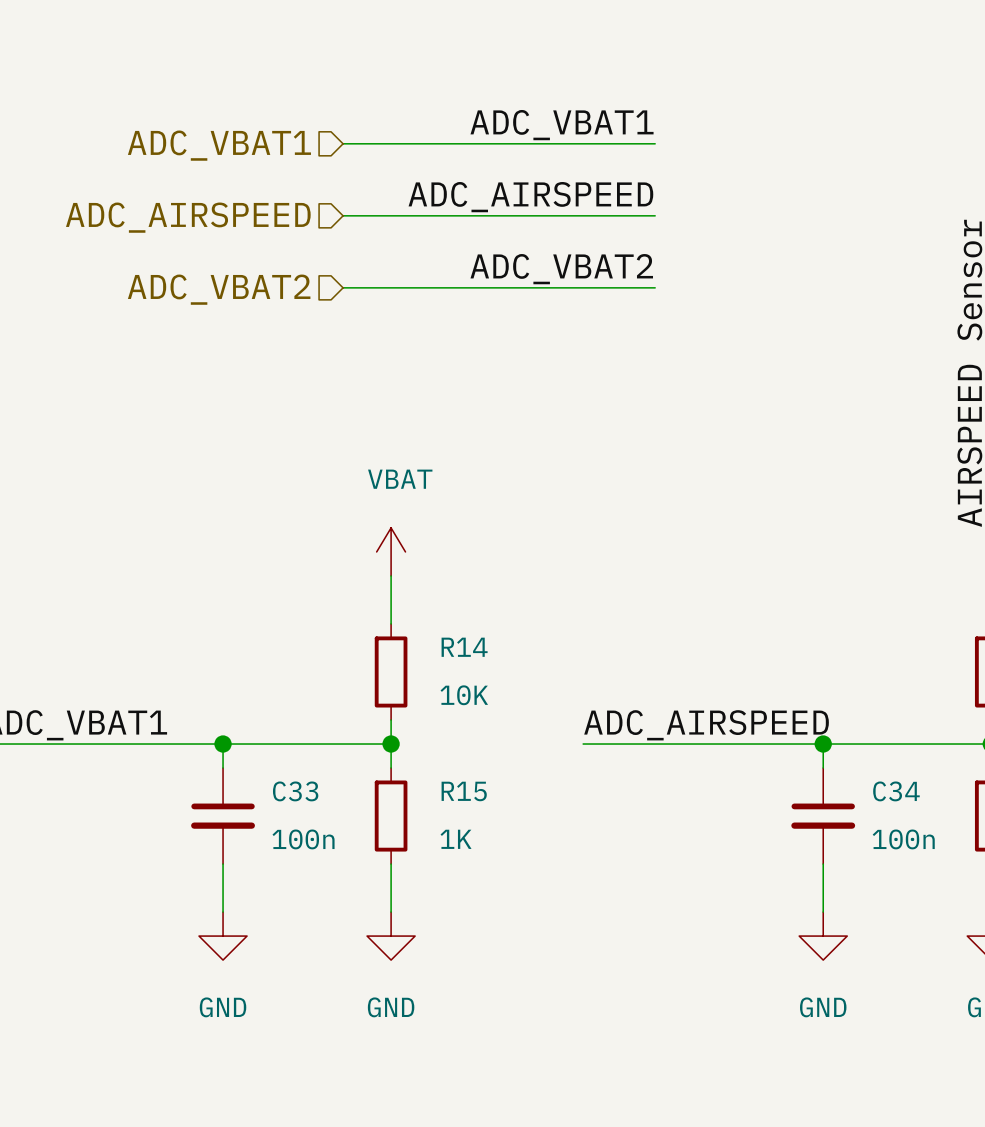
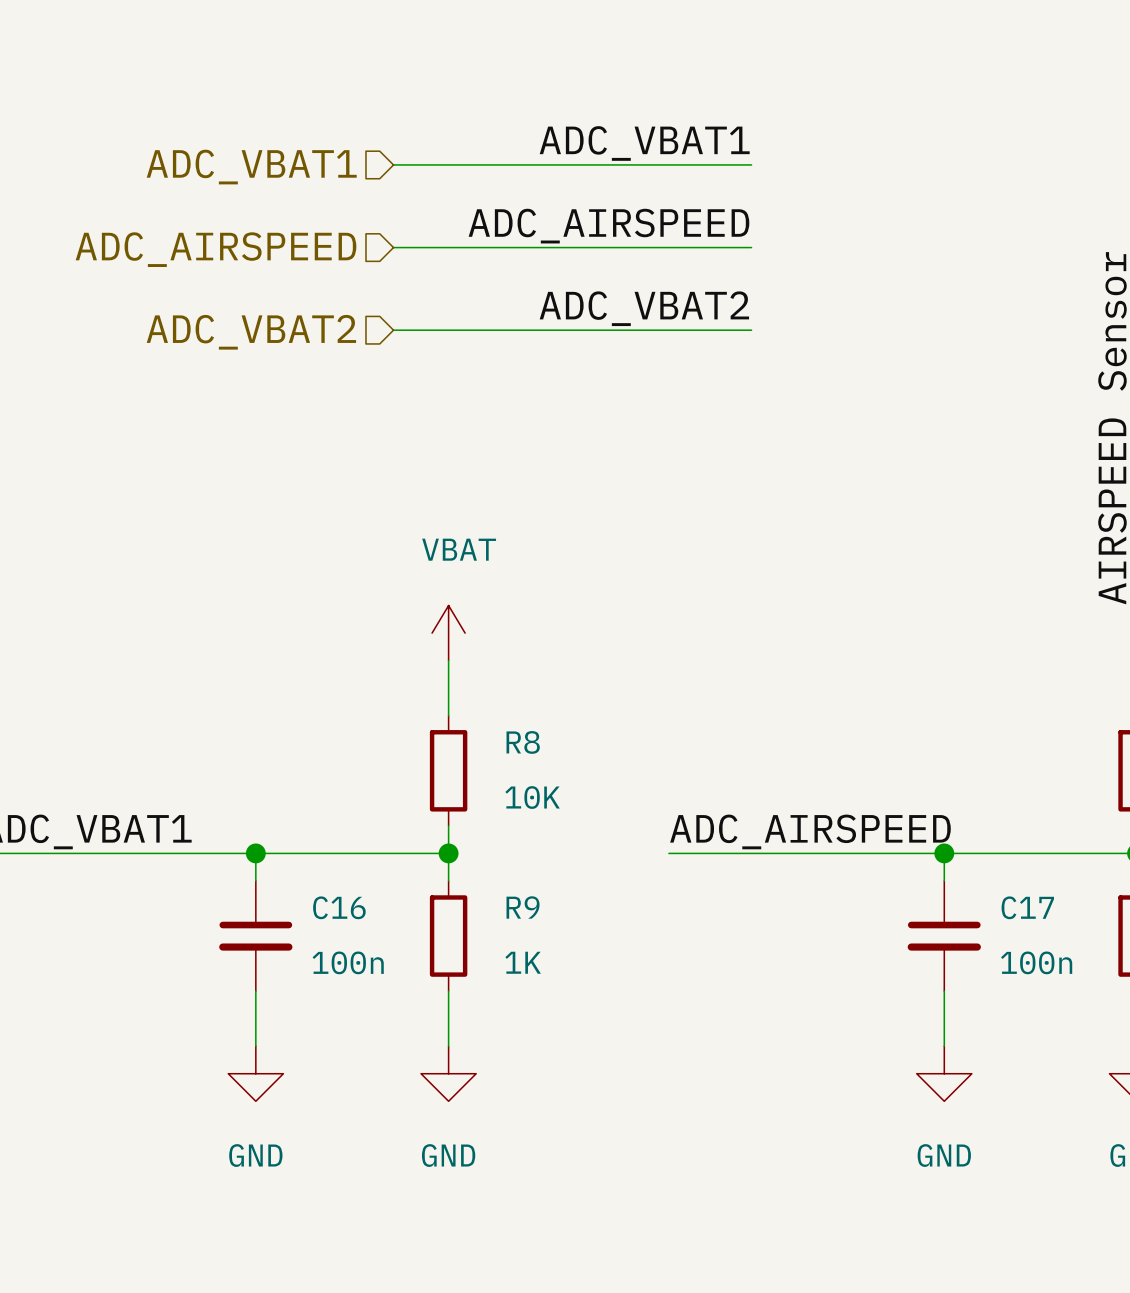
R14 name: R14 (464, 647) -> R8 (523, 742)
C33 name: C33 (295, 791) -> C16 (339, 907)
R15 name: R15 (464, 791) -> R9 (523, 907)
C34 name: C34 (896, 791) -> C17 (1027, 907)

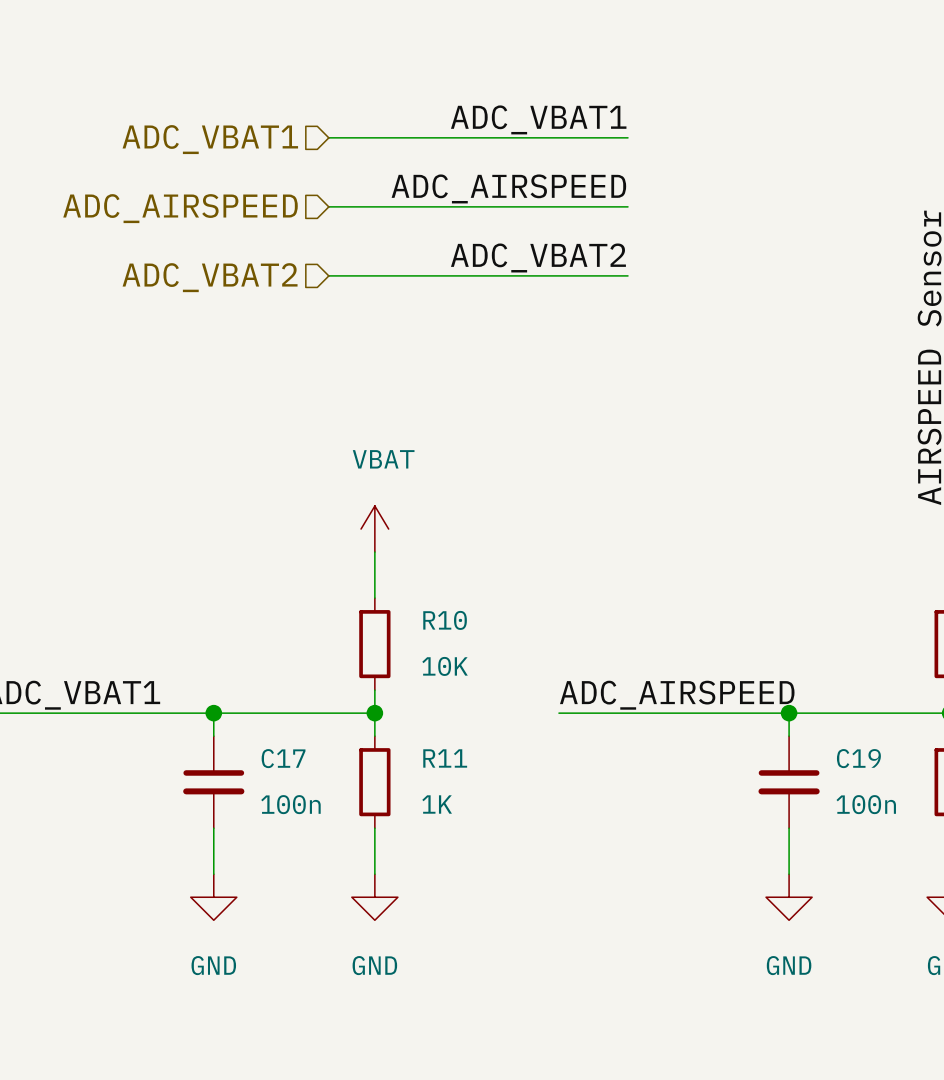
R8 name: R8 (523, 742) -> R10 (445, 620)
C16 name: C16 (339, 907) -> C17 (283, 758)
R9 name: R9 (523, 907) -> R11 (445, 758)
C17 name: C17 (1027, 907) -> C19 (858, 758)

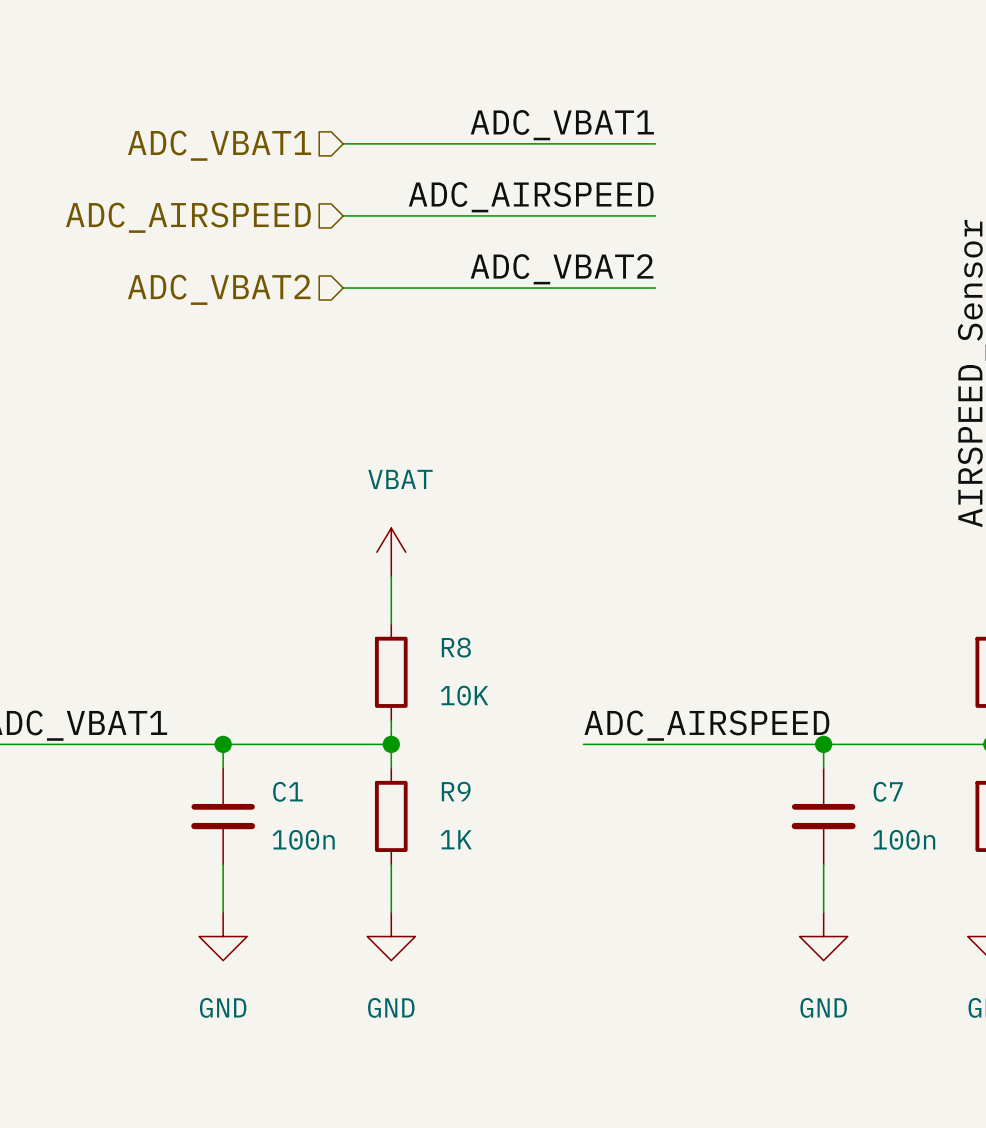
R10 name: R10 (445, 620) -> R8 (456, 647)
C17 name: C17 (283, 758) -> C1 (288, 791)
R11 name: R11 (445, 758) -> R9 (456, 791)
C19 name: C19 (858, 758) -> C7 (888, 791)

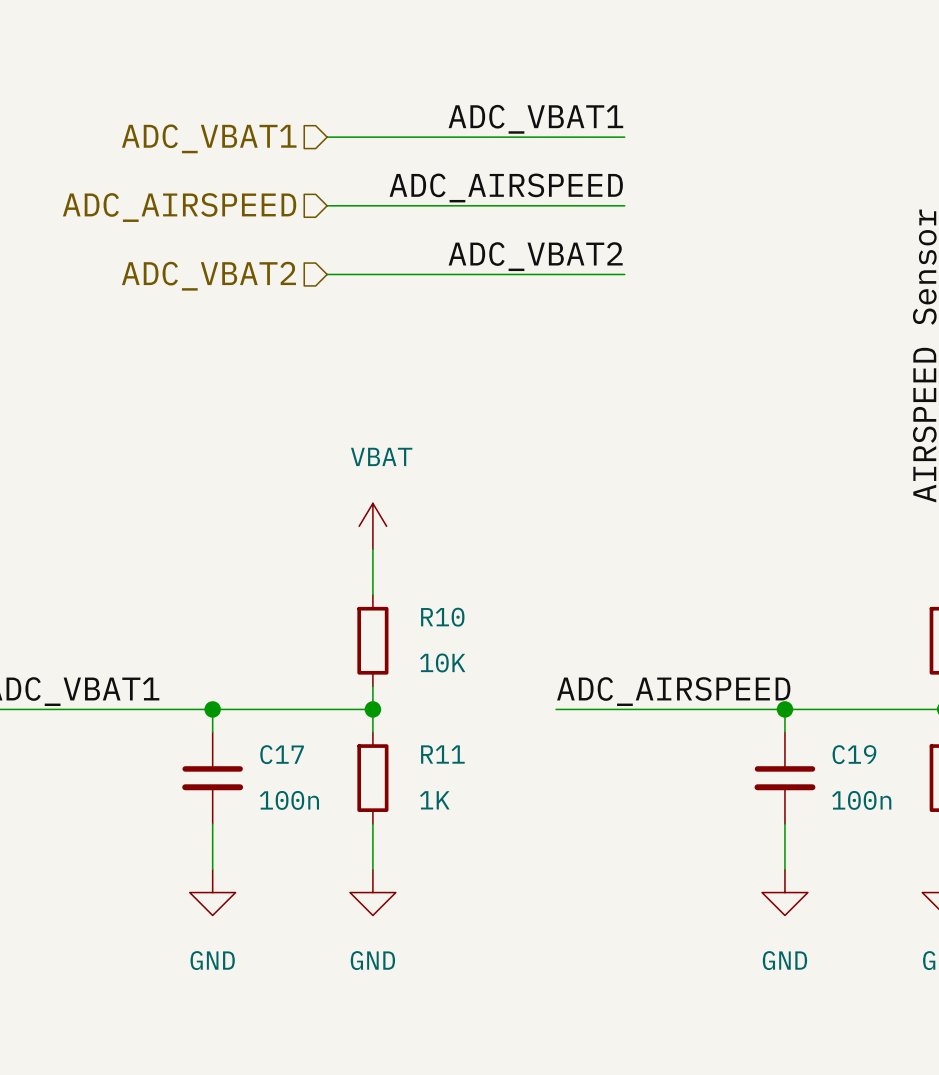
R8 name: R8 (456, 647) -> R10 (442, 617)
C1 name: C1 (288, 791) -> C17 (282, 754)
R9 name: R9 (456, 791) -> R11 (442, 754)
C7 name: C7 (888, 791) -> C19 (854, 754)

